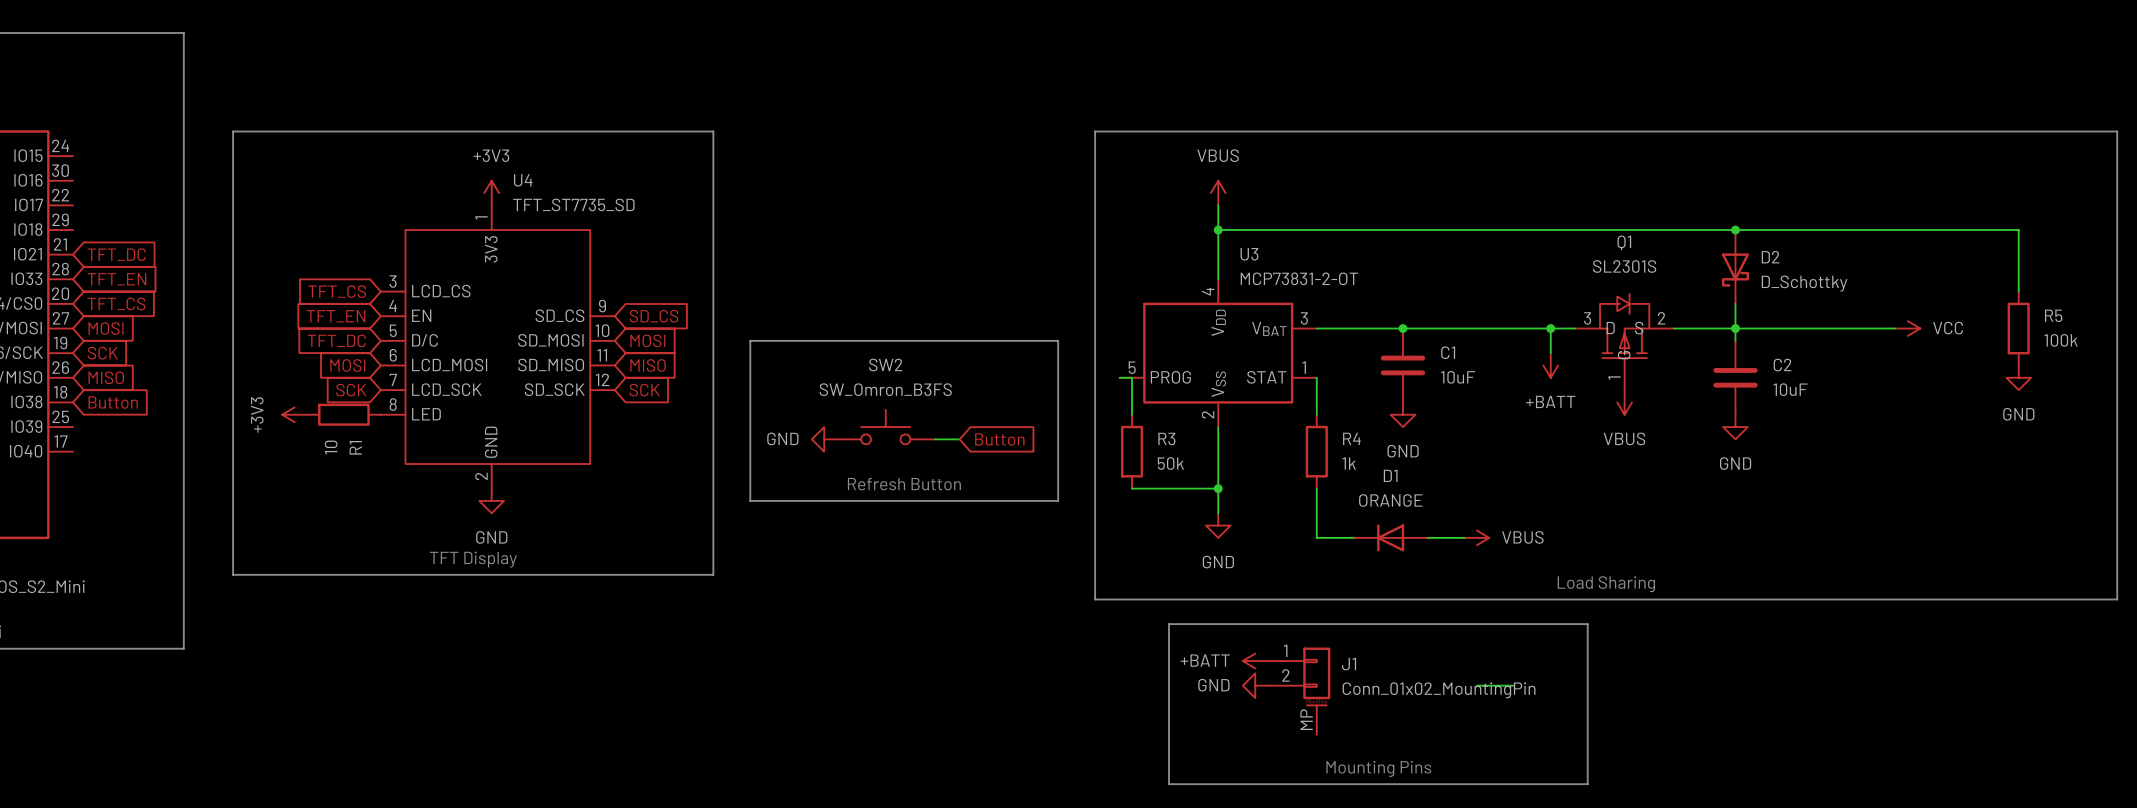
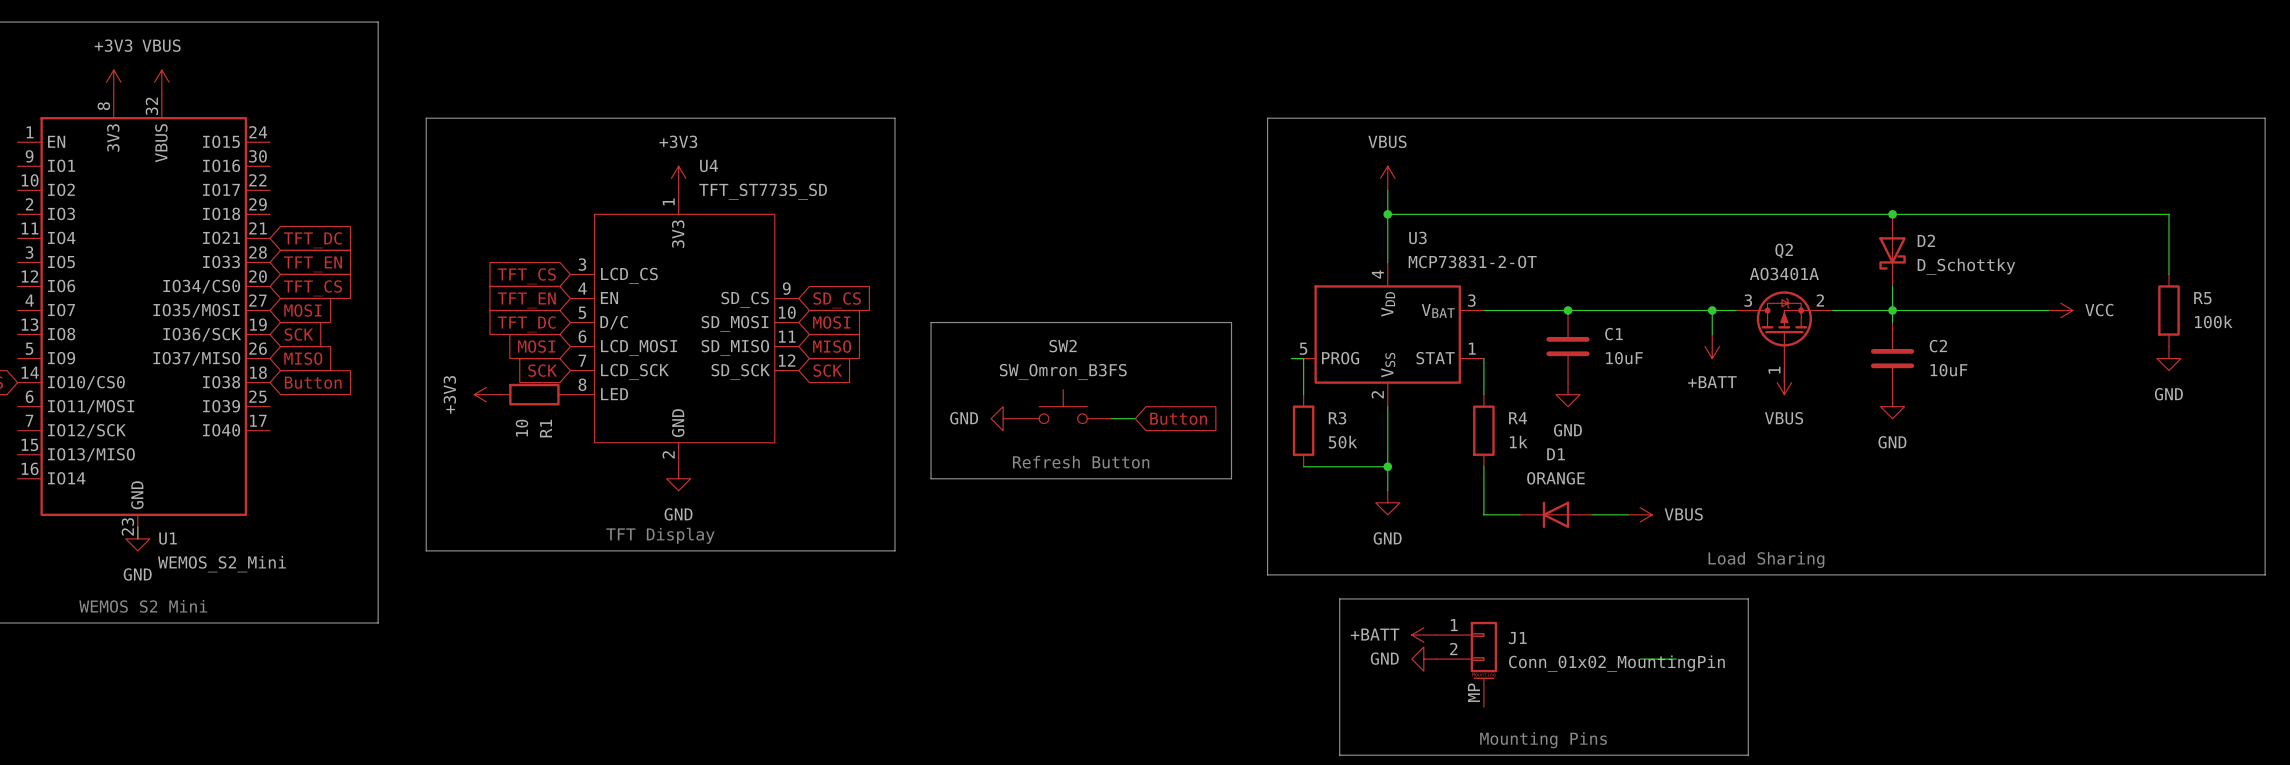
Q1: SL2301S (1624, 342) -> none
Q2: none -> AO3401A (1784, 336)

